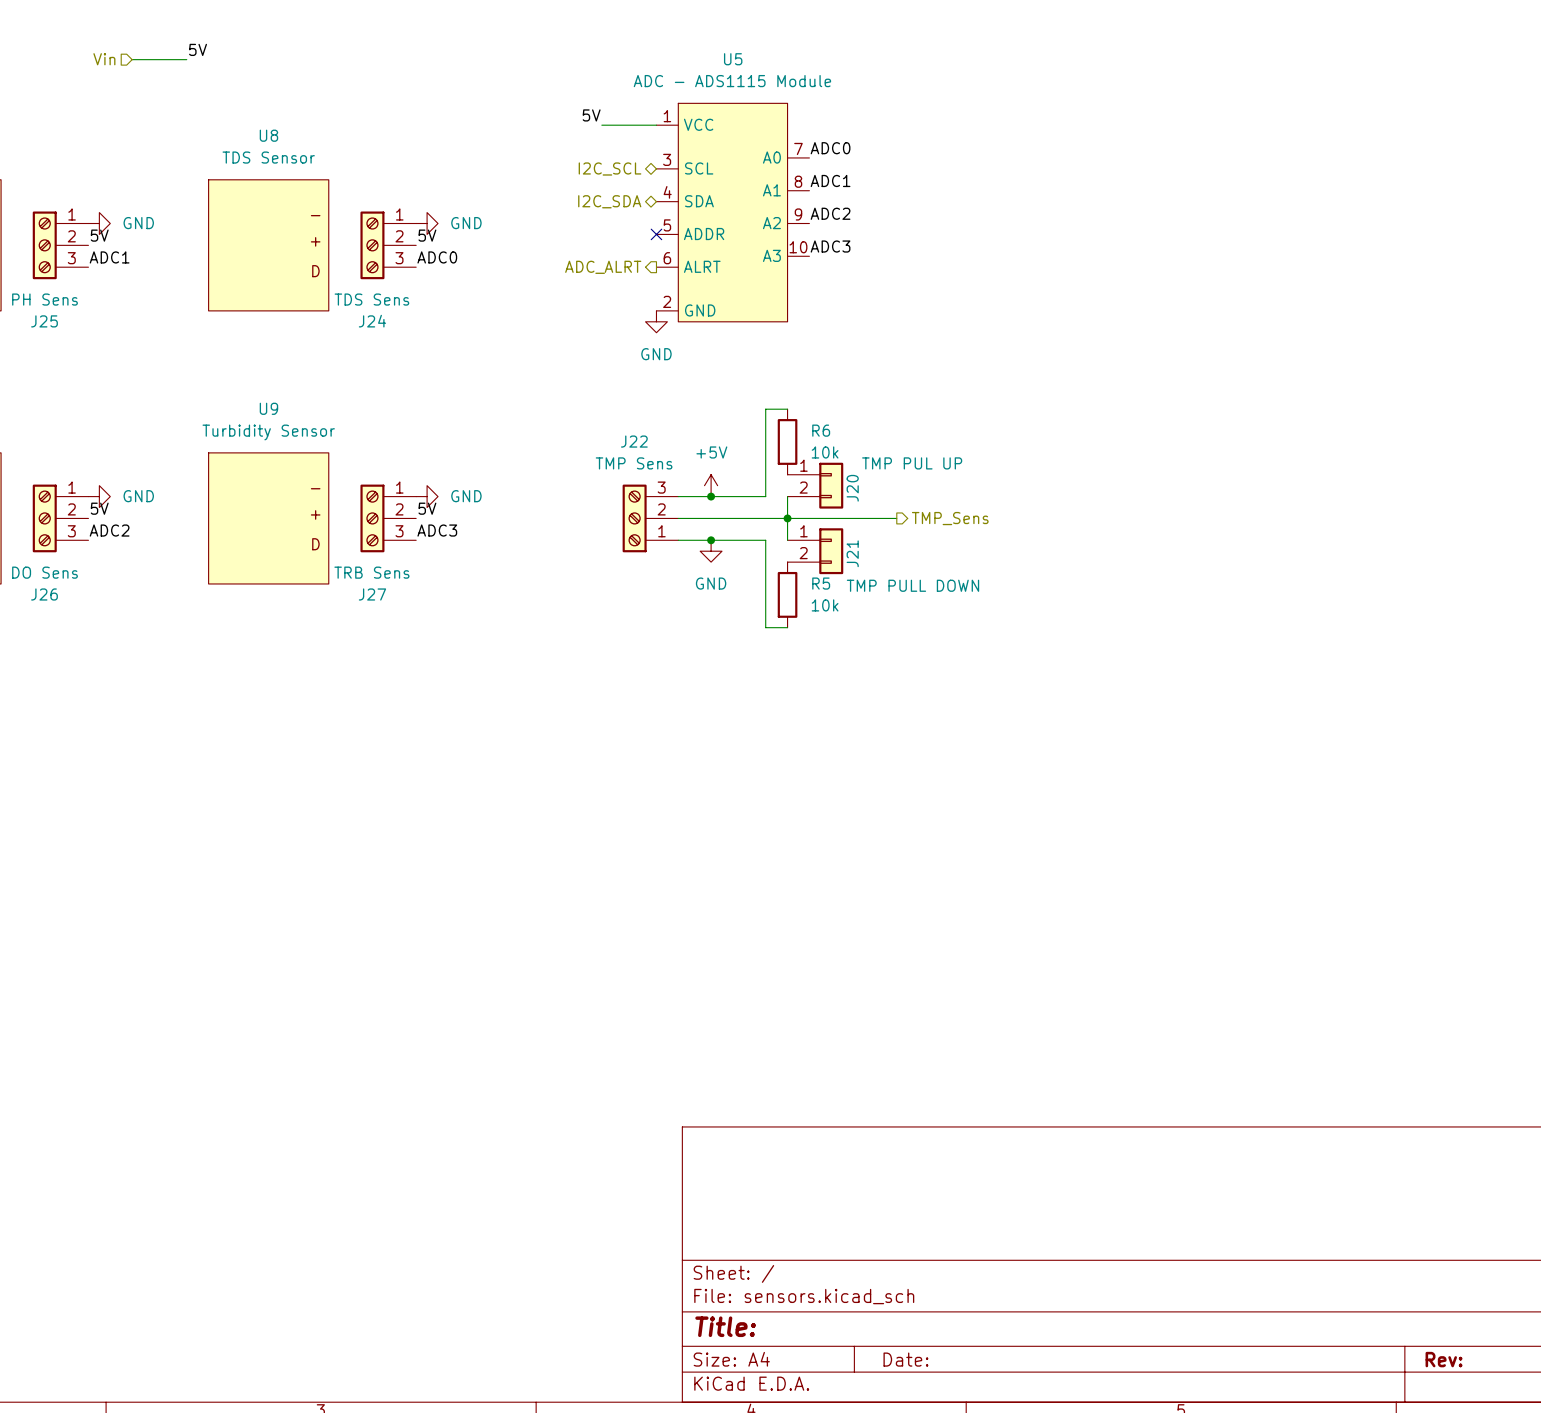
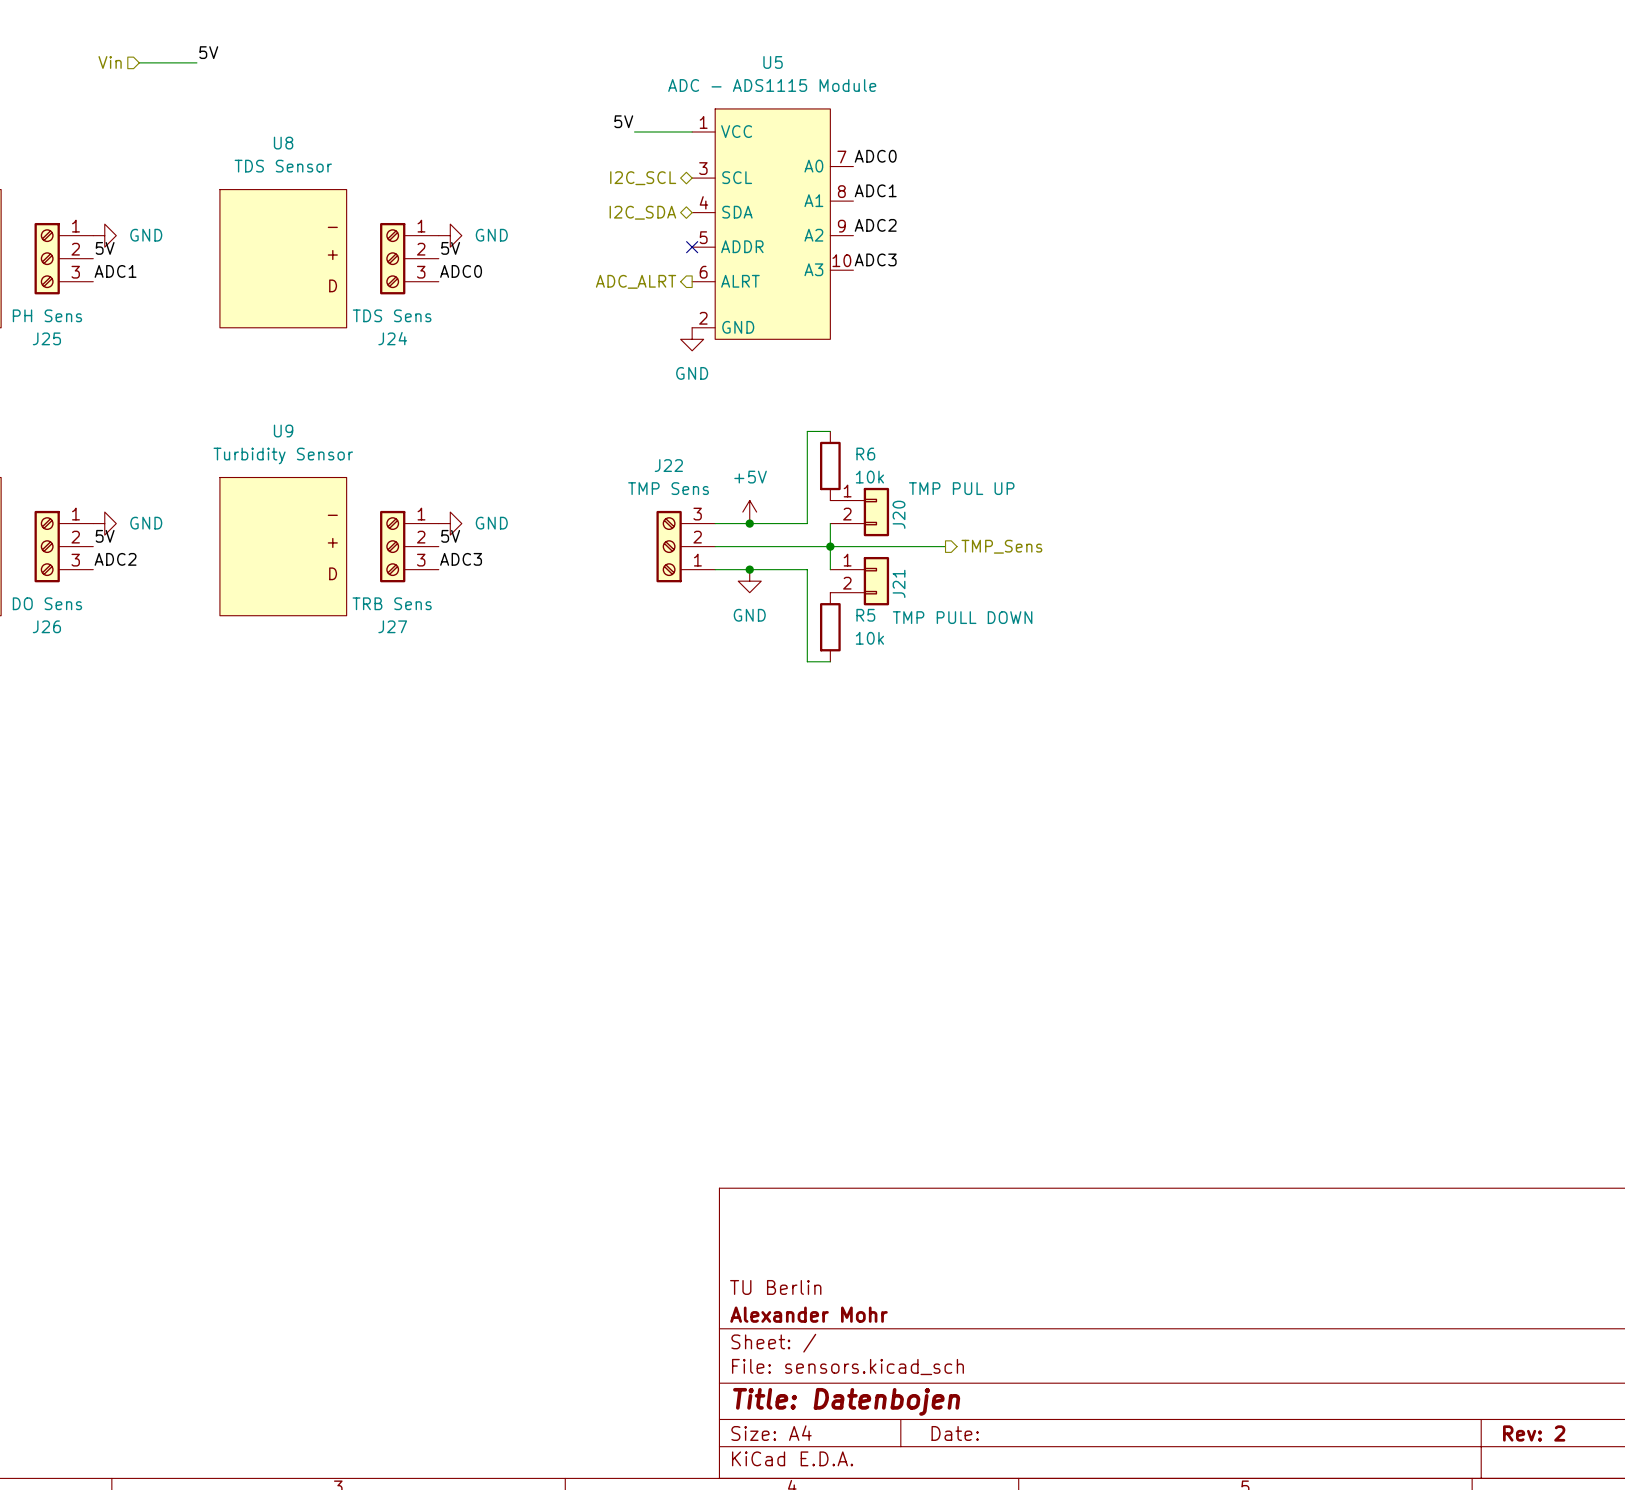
title block: none -> TU Berlin (775, 1287)
title block: none -> Alexander Mohr (809, 1314)
title block: Title: (725, 1326) -> Title: Datenbojen (846, 1401)
title block: Rev: (1444, 1359) -> Rev: 2 (1534, 1433)

